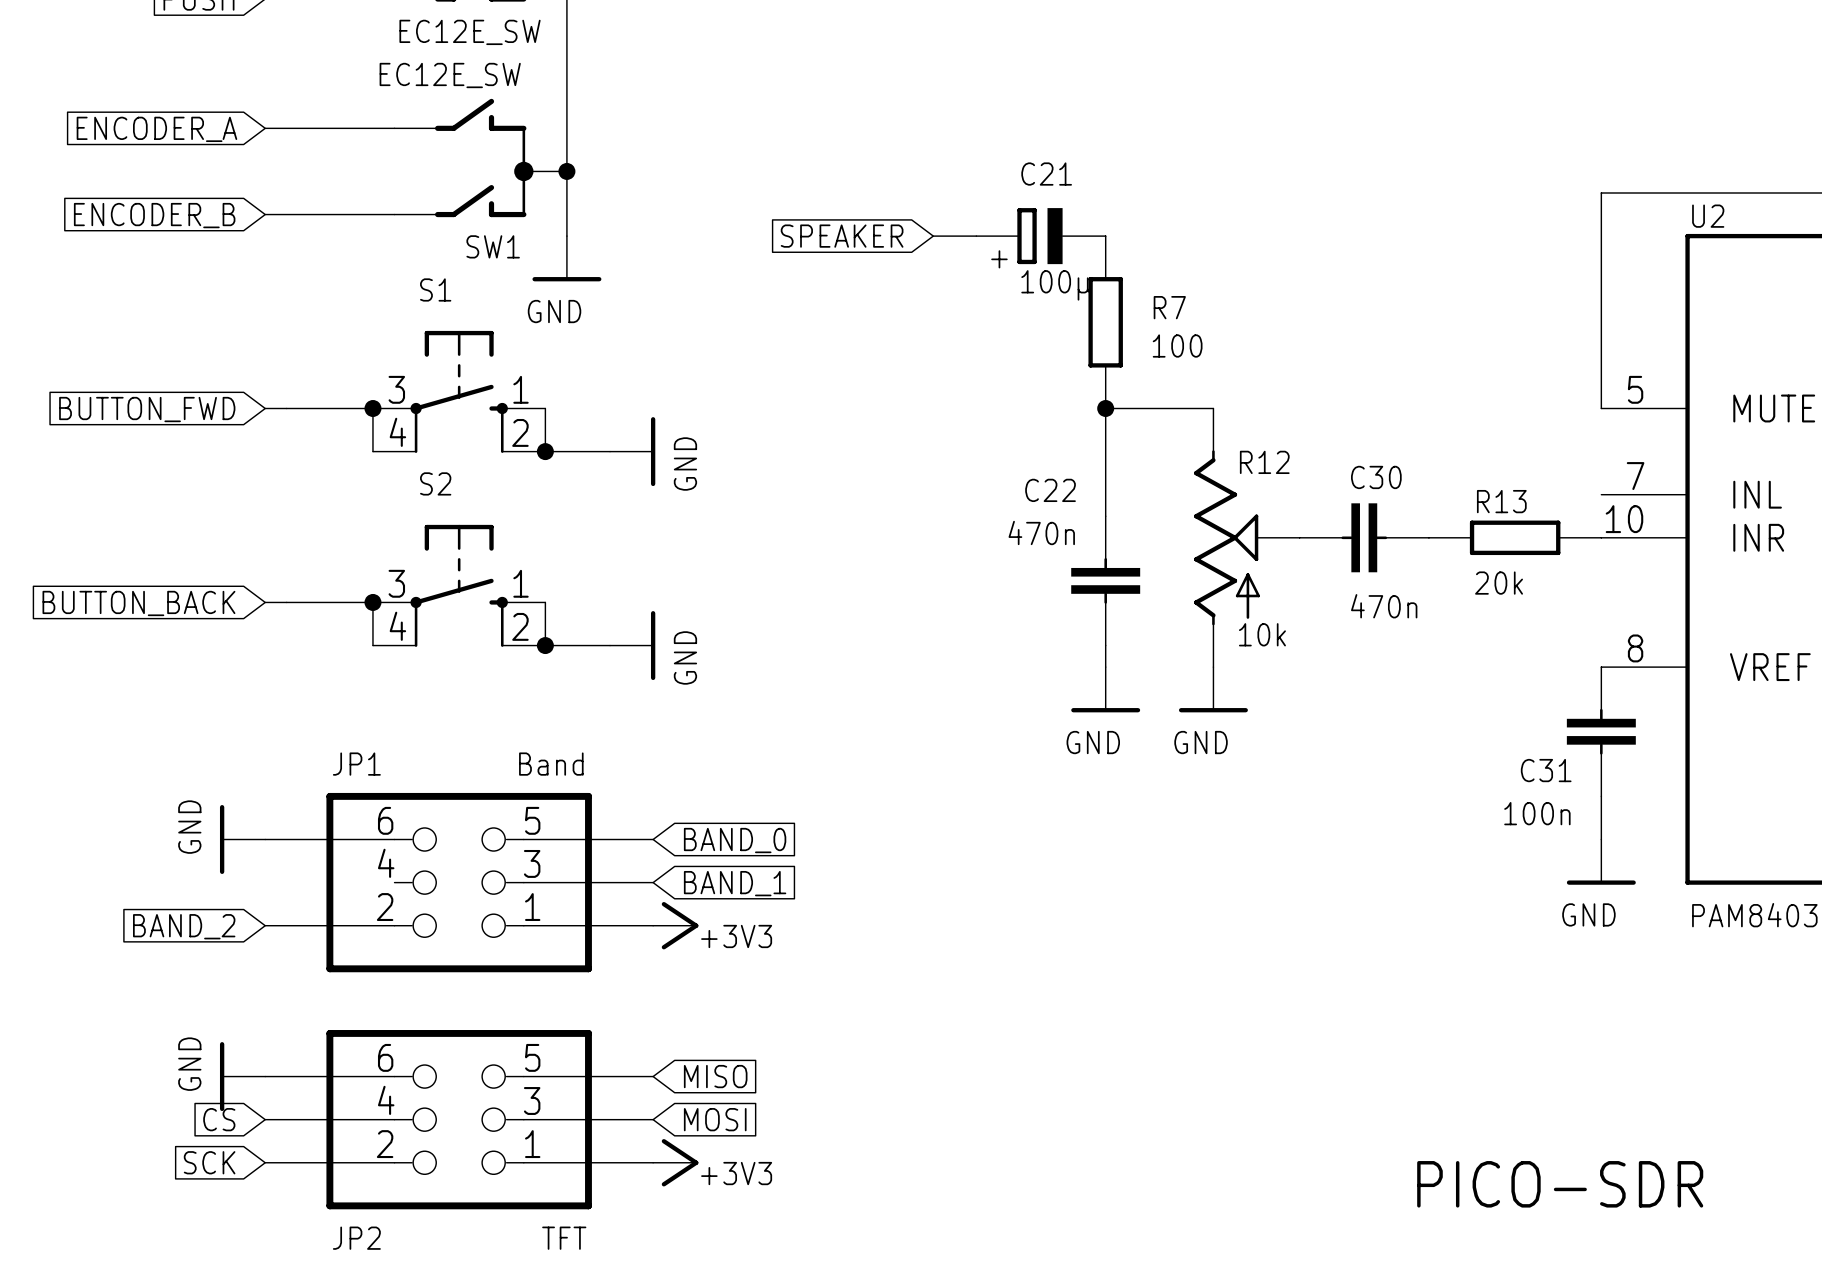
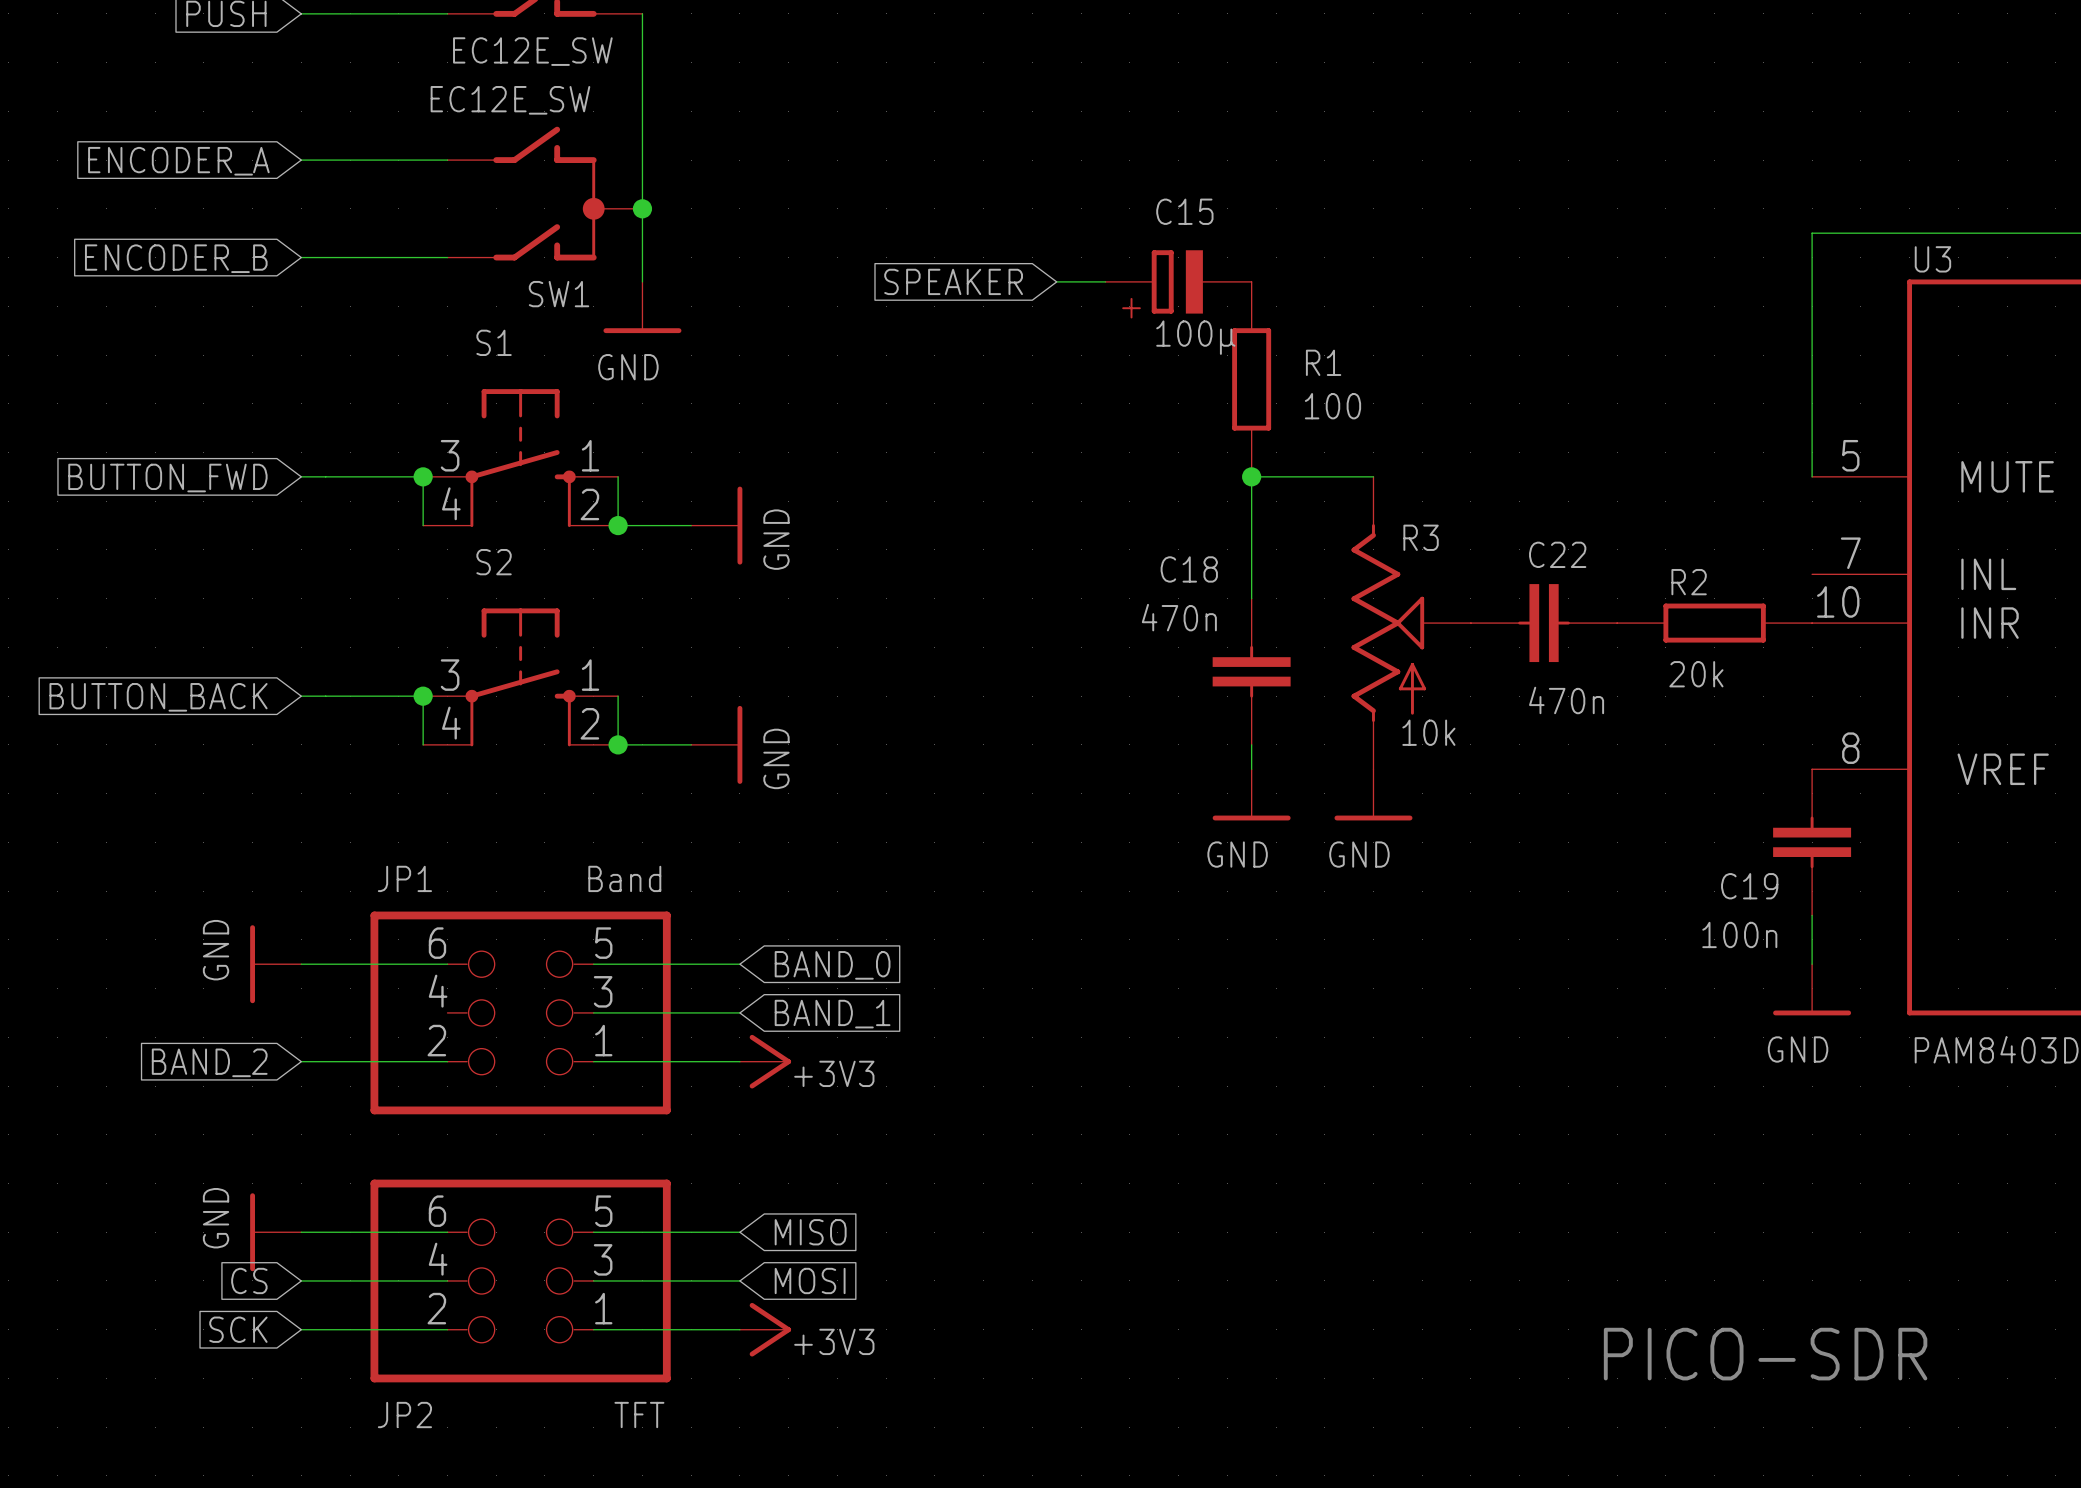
C21 name: C21 (1046, 174) -> C15 (1184, 211)
U2 name: U2 (1708, 216) -> U3 (1932, 259)
R7 name: R7 (1169, 307) -> R1 (1323, 362)
R12 name: R12 (1264, 462) -> R3 (1421, 537)
C30 name: C30 (1376, 477) -> C22 (1557, 554)
C22 name: C22 (1050, 490) -> C18 (1189, 569)
R13 name: R13 (1501, 501) -> R2 (1689, 582)
C31 name: C31 (1546, 770) -> C19 (1749, 886)

